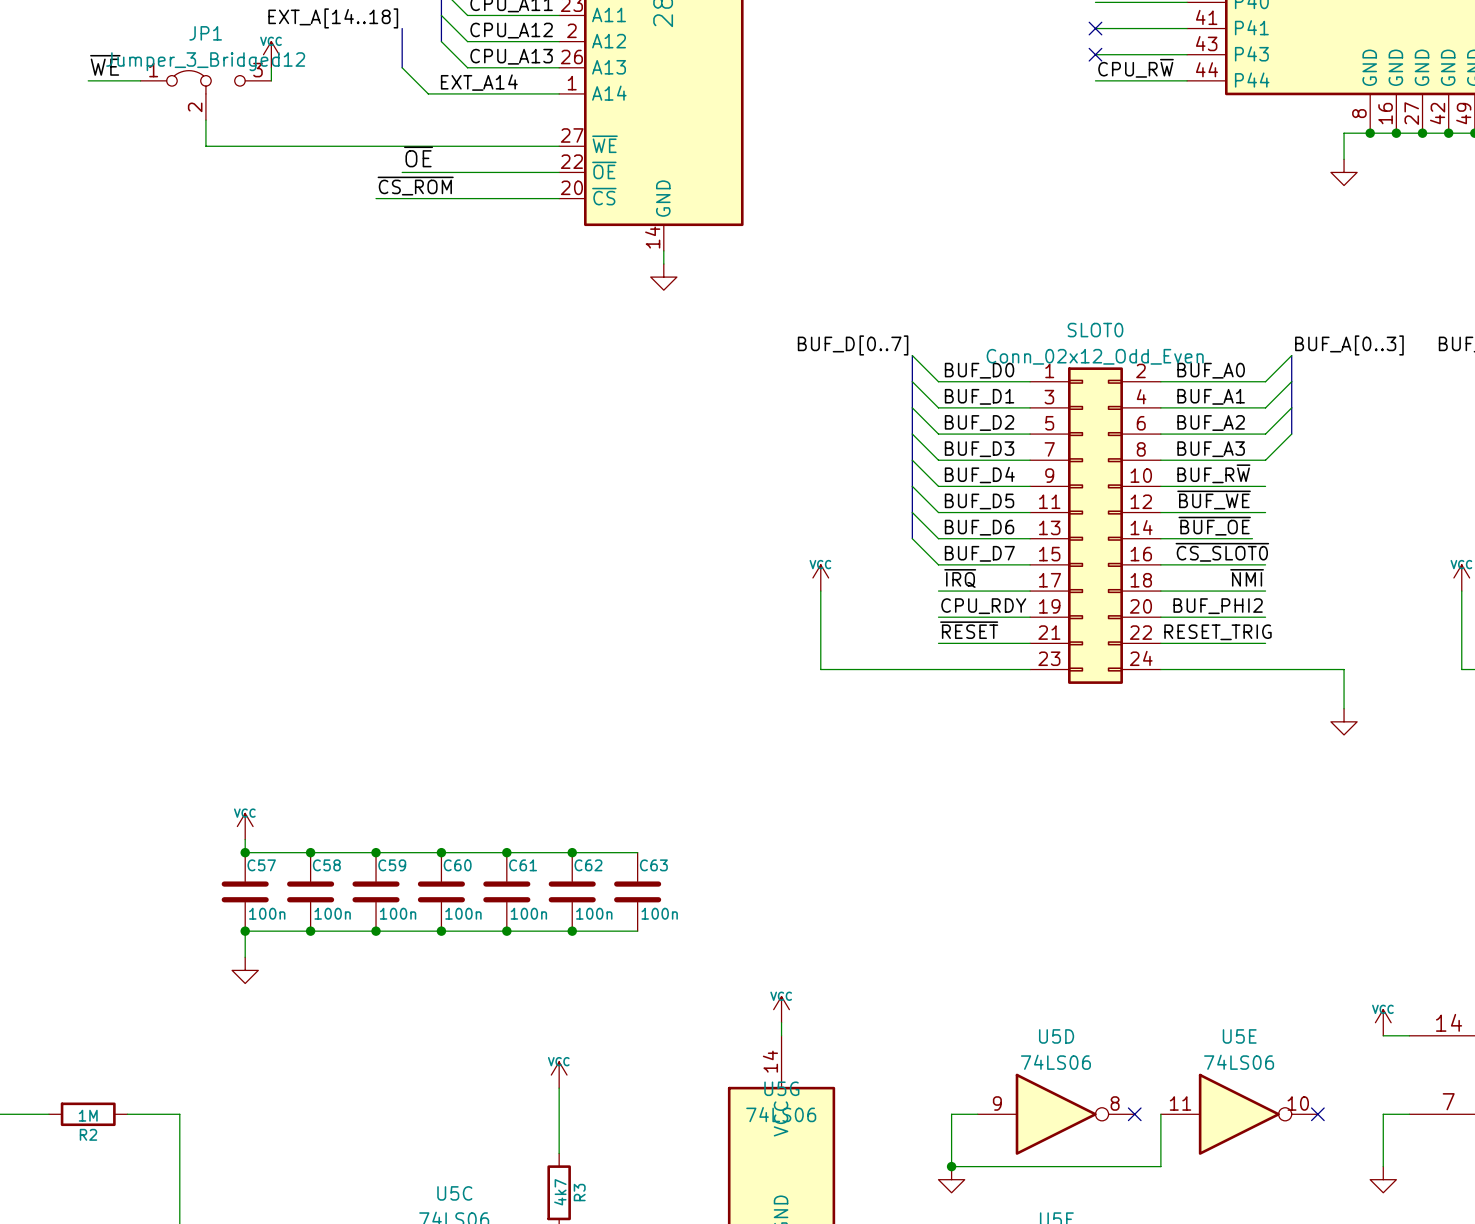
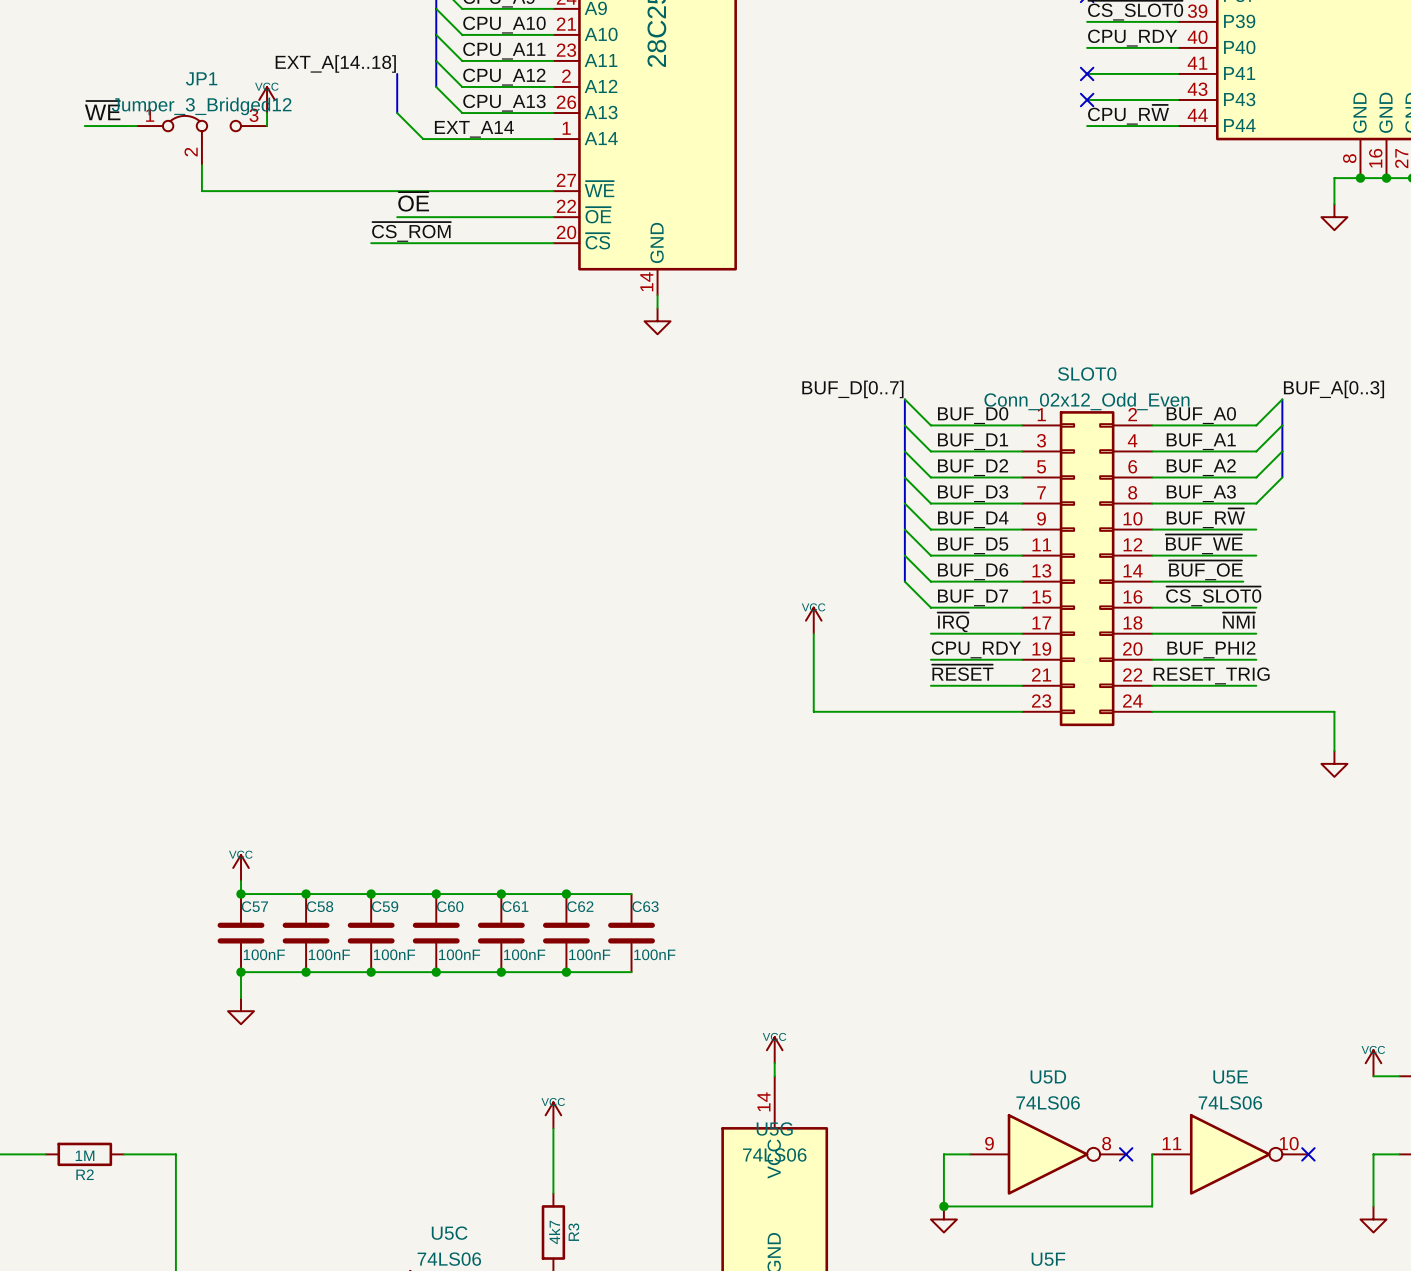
C57 value: 100n (267, 913) -> 100nF (264, 954)
C58 value: 100n (332, 913) -> 100nF (329, 954)
C59 value: 100n (398, 913) -> 100nF (394, 954)
C60 value: 100n (463, 913) -> 100nF (459, 954)
C61 value: 100n (528, 913) -> 100nF (524, 954)
C62 value: 100n (594, 913) -> 100nF (589, 954)
C63 value: 100n (659, 913) -> 100nF (654, 954)

